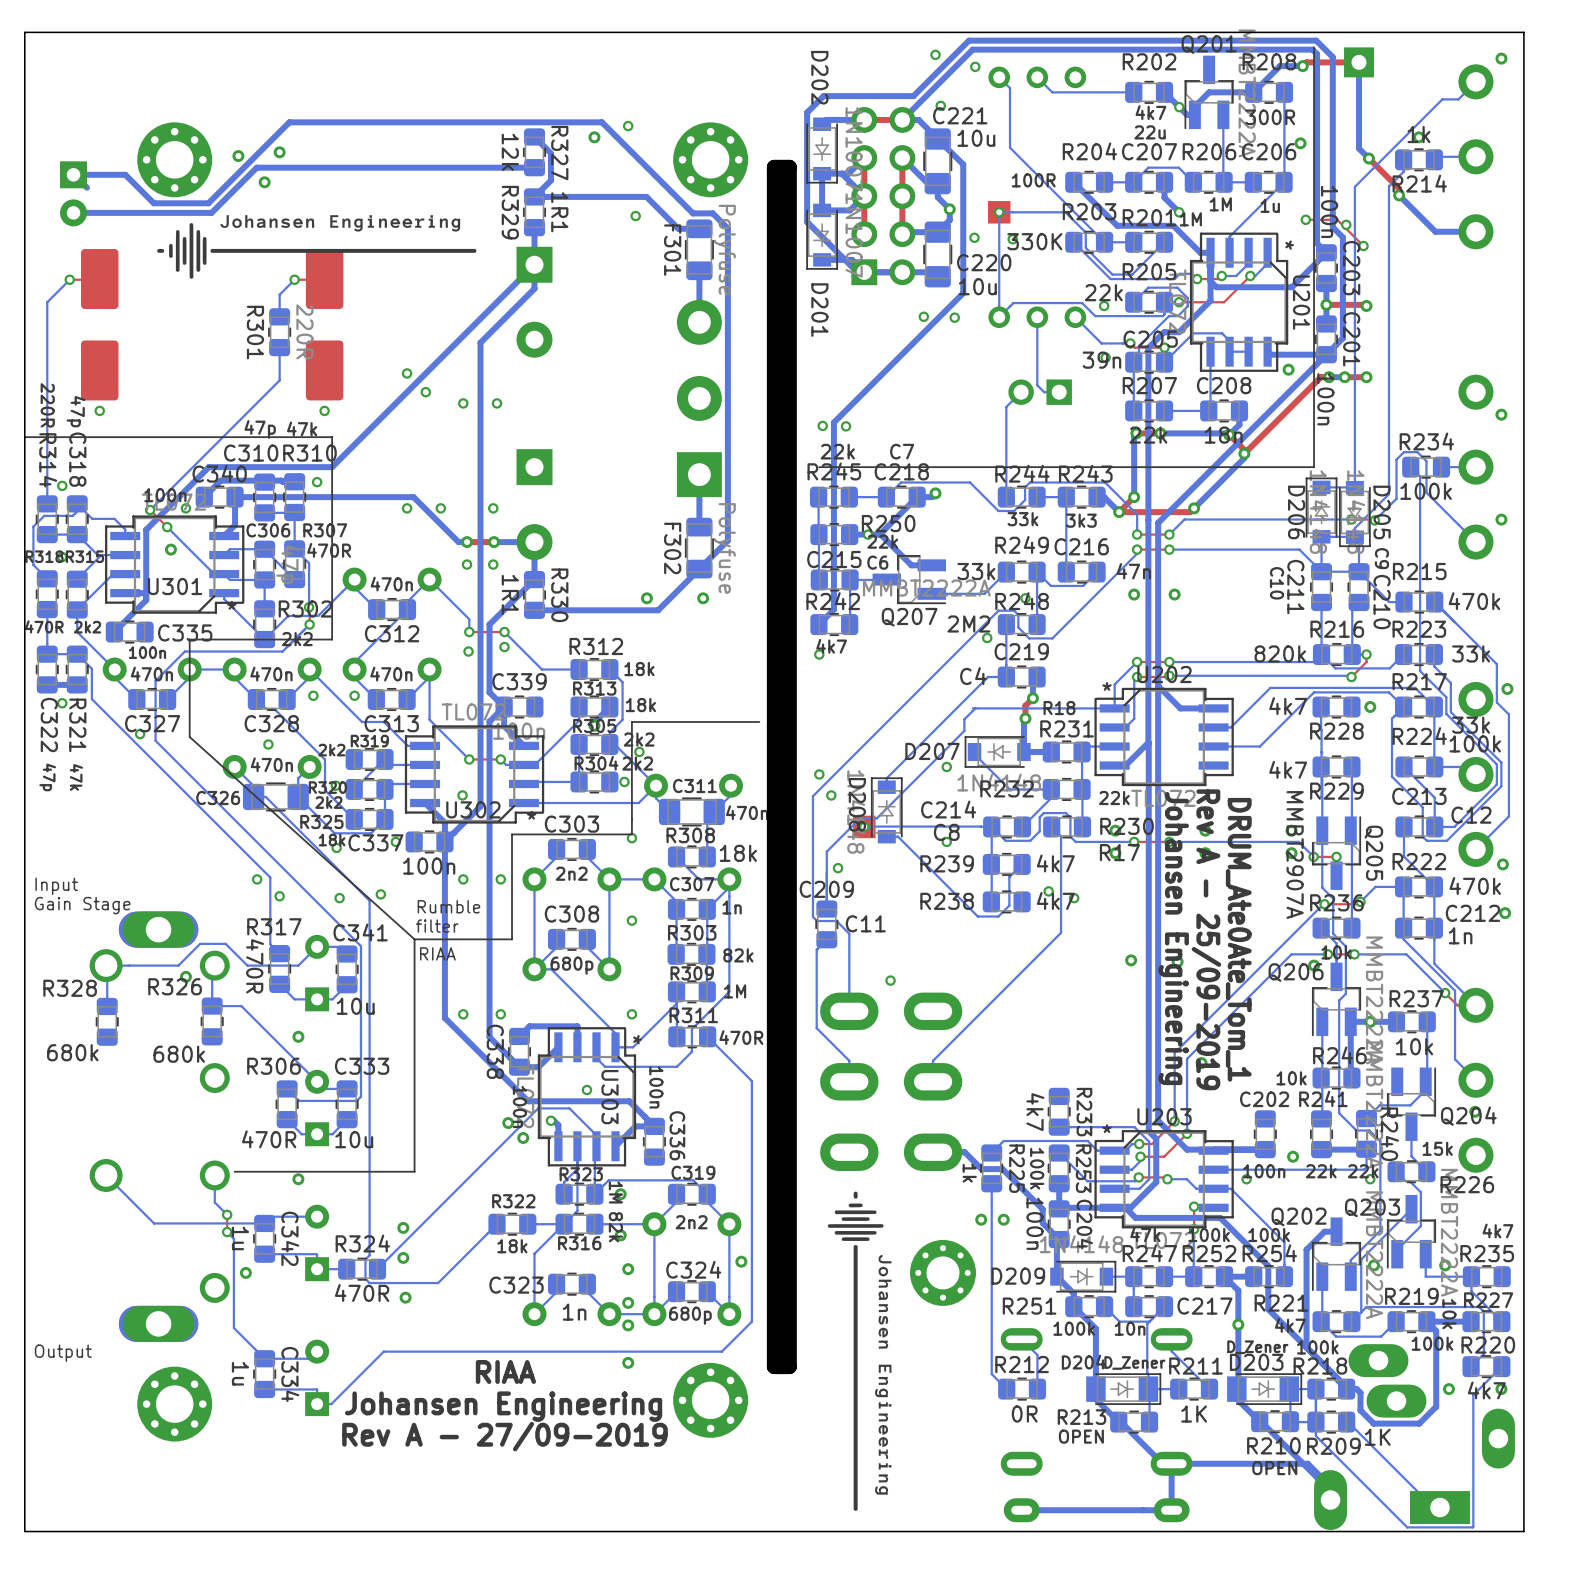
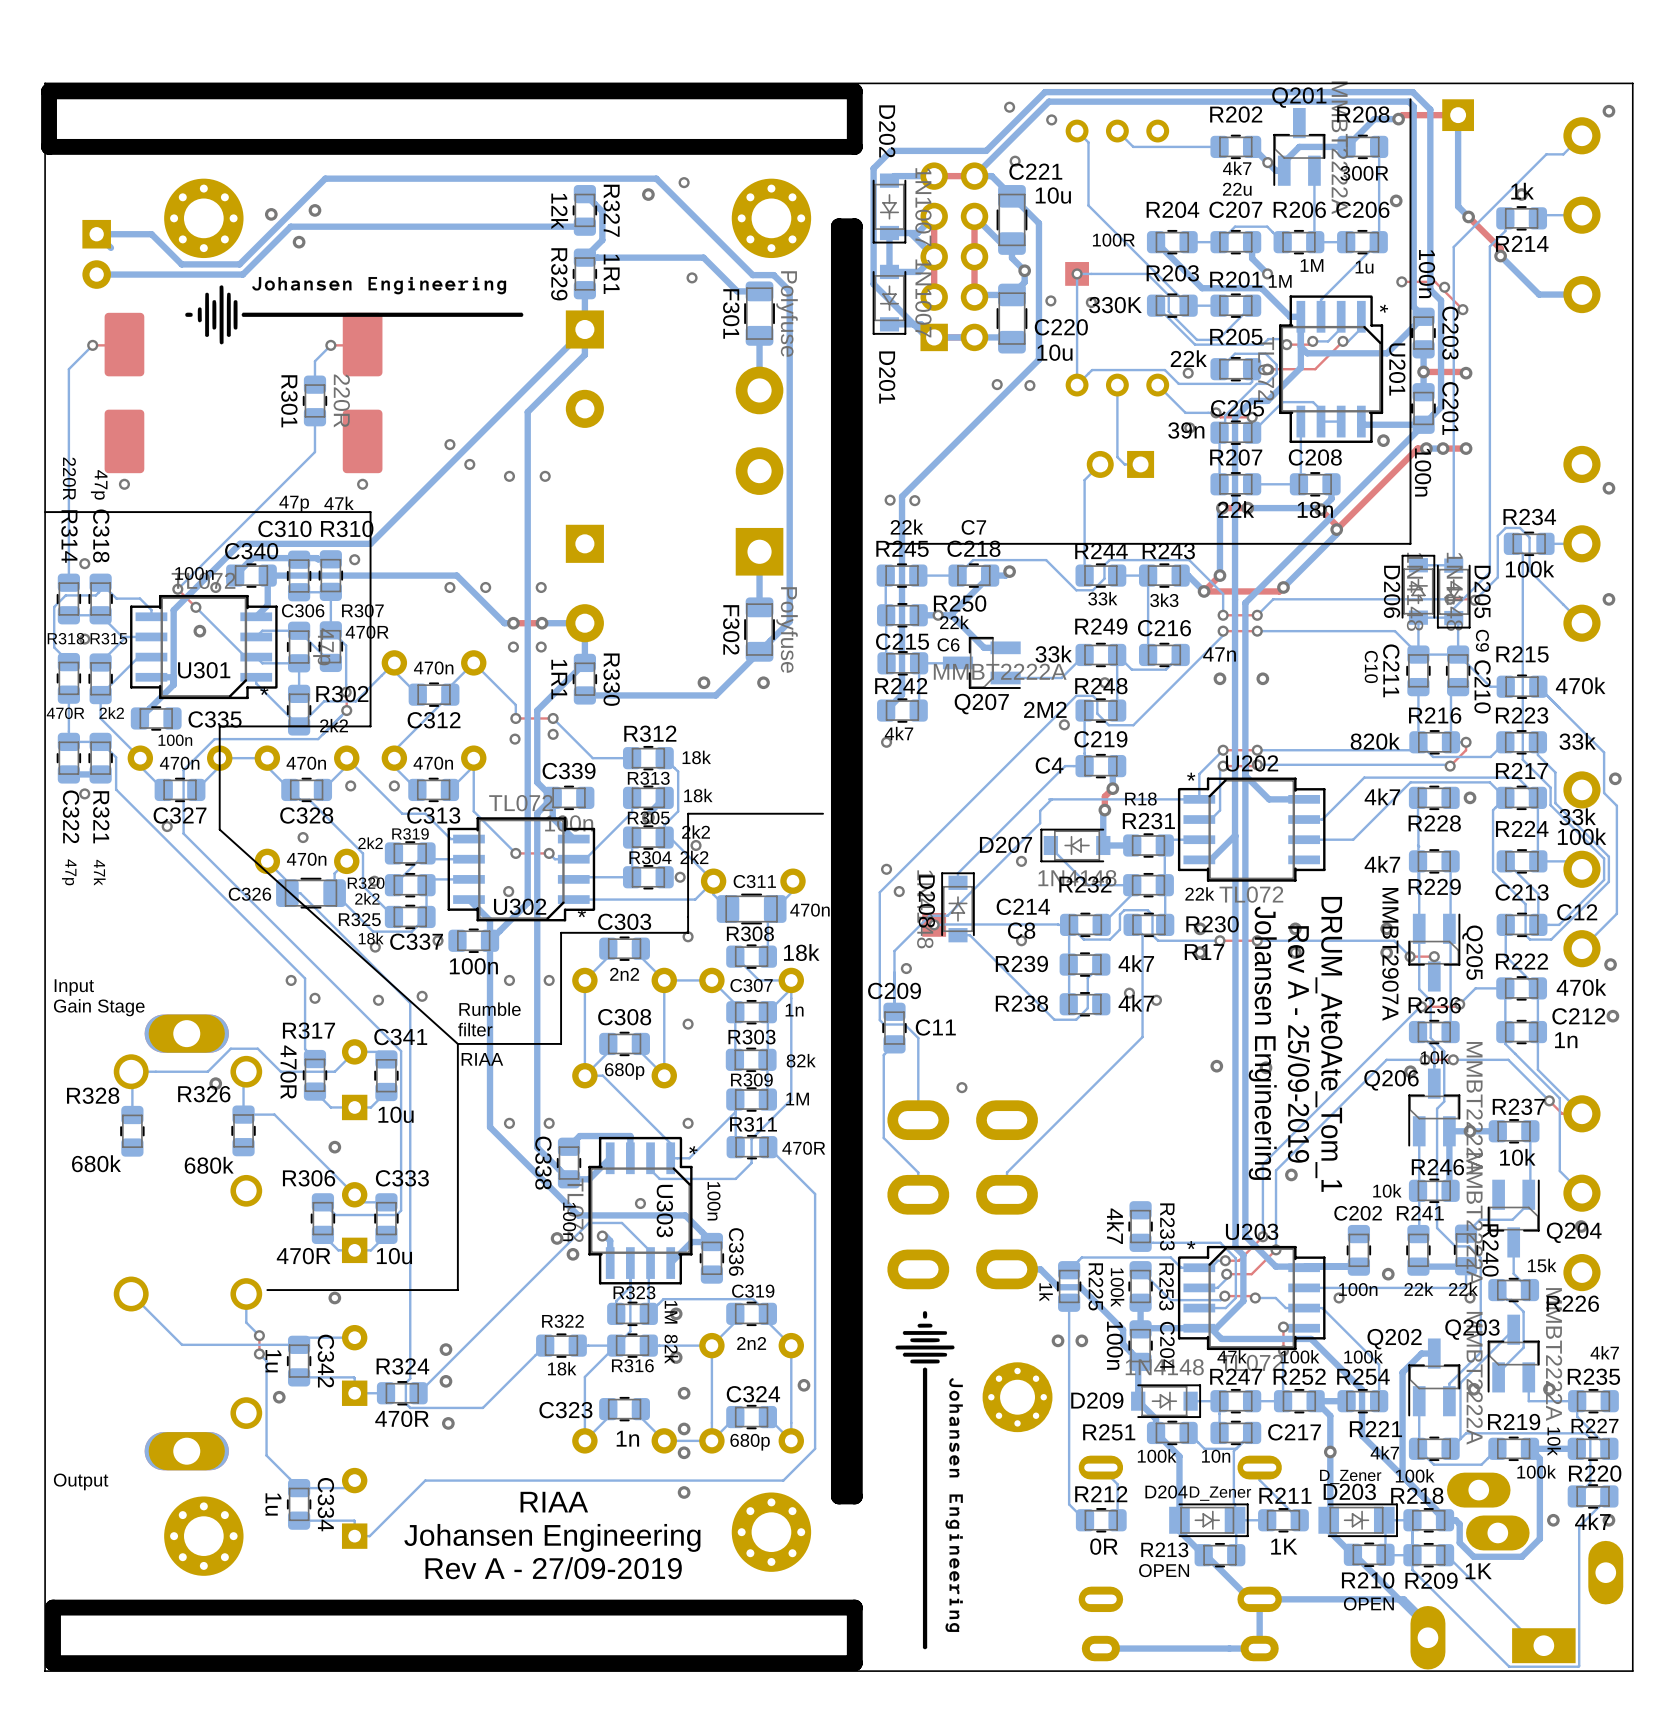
board edge: none -> (854, 91) (854, 146) (49, 146) (49, 91) (854, 91)
board edge: none -> (854, 1607) (854, 1663) (53, 1663) (53, 1607) (854, 1607)

